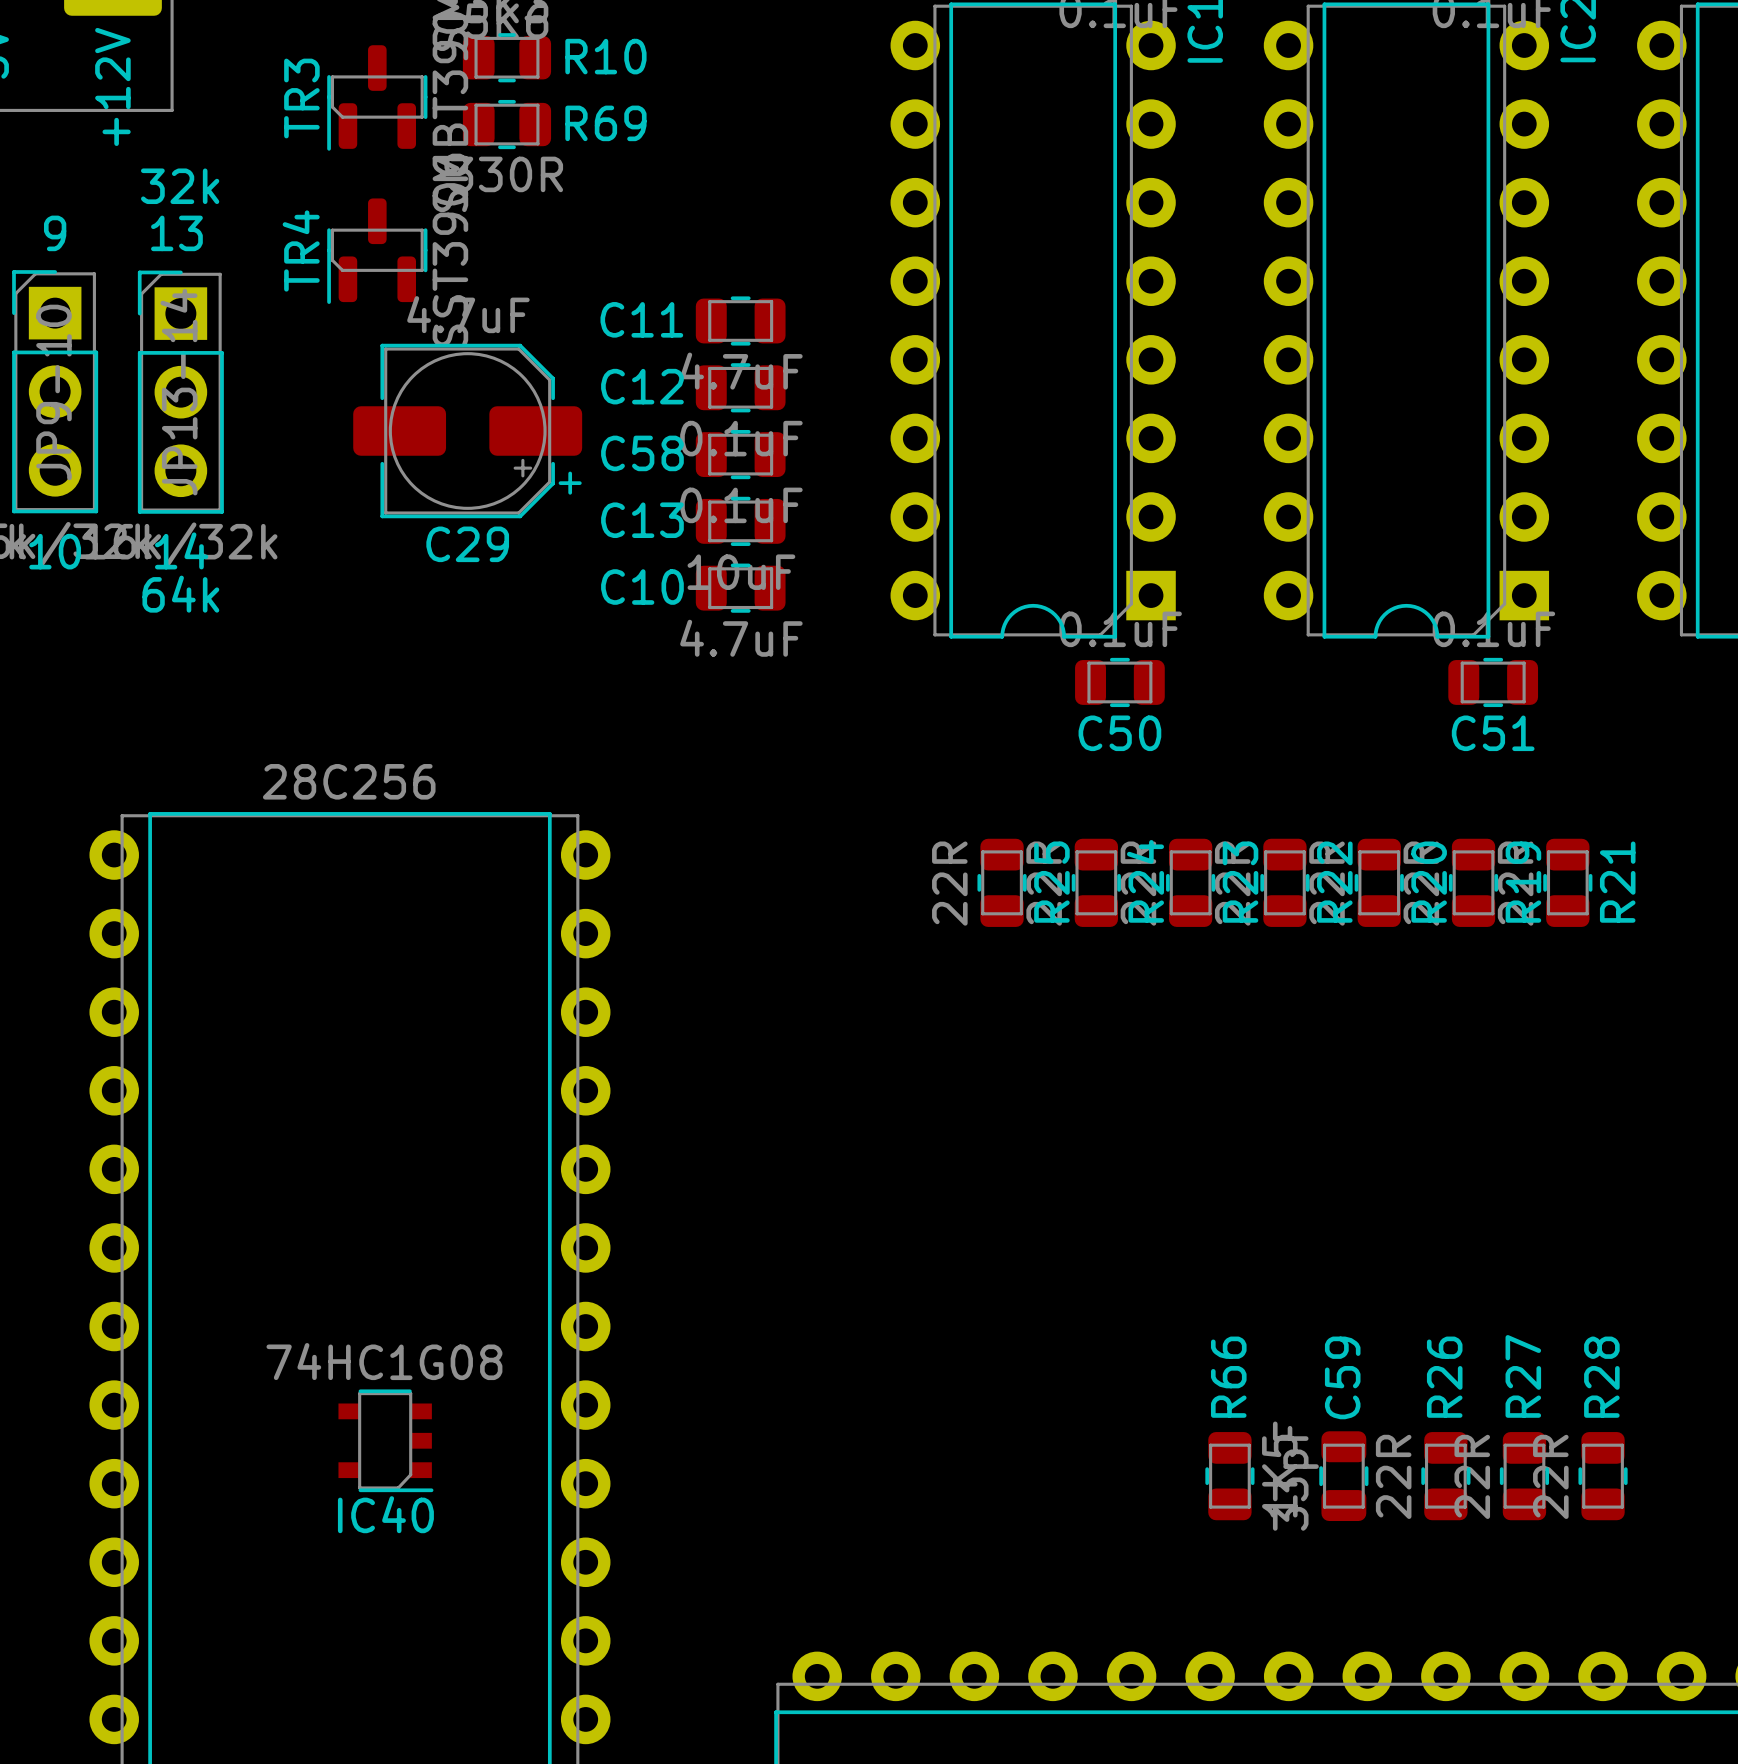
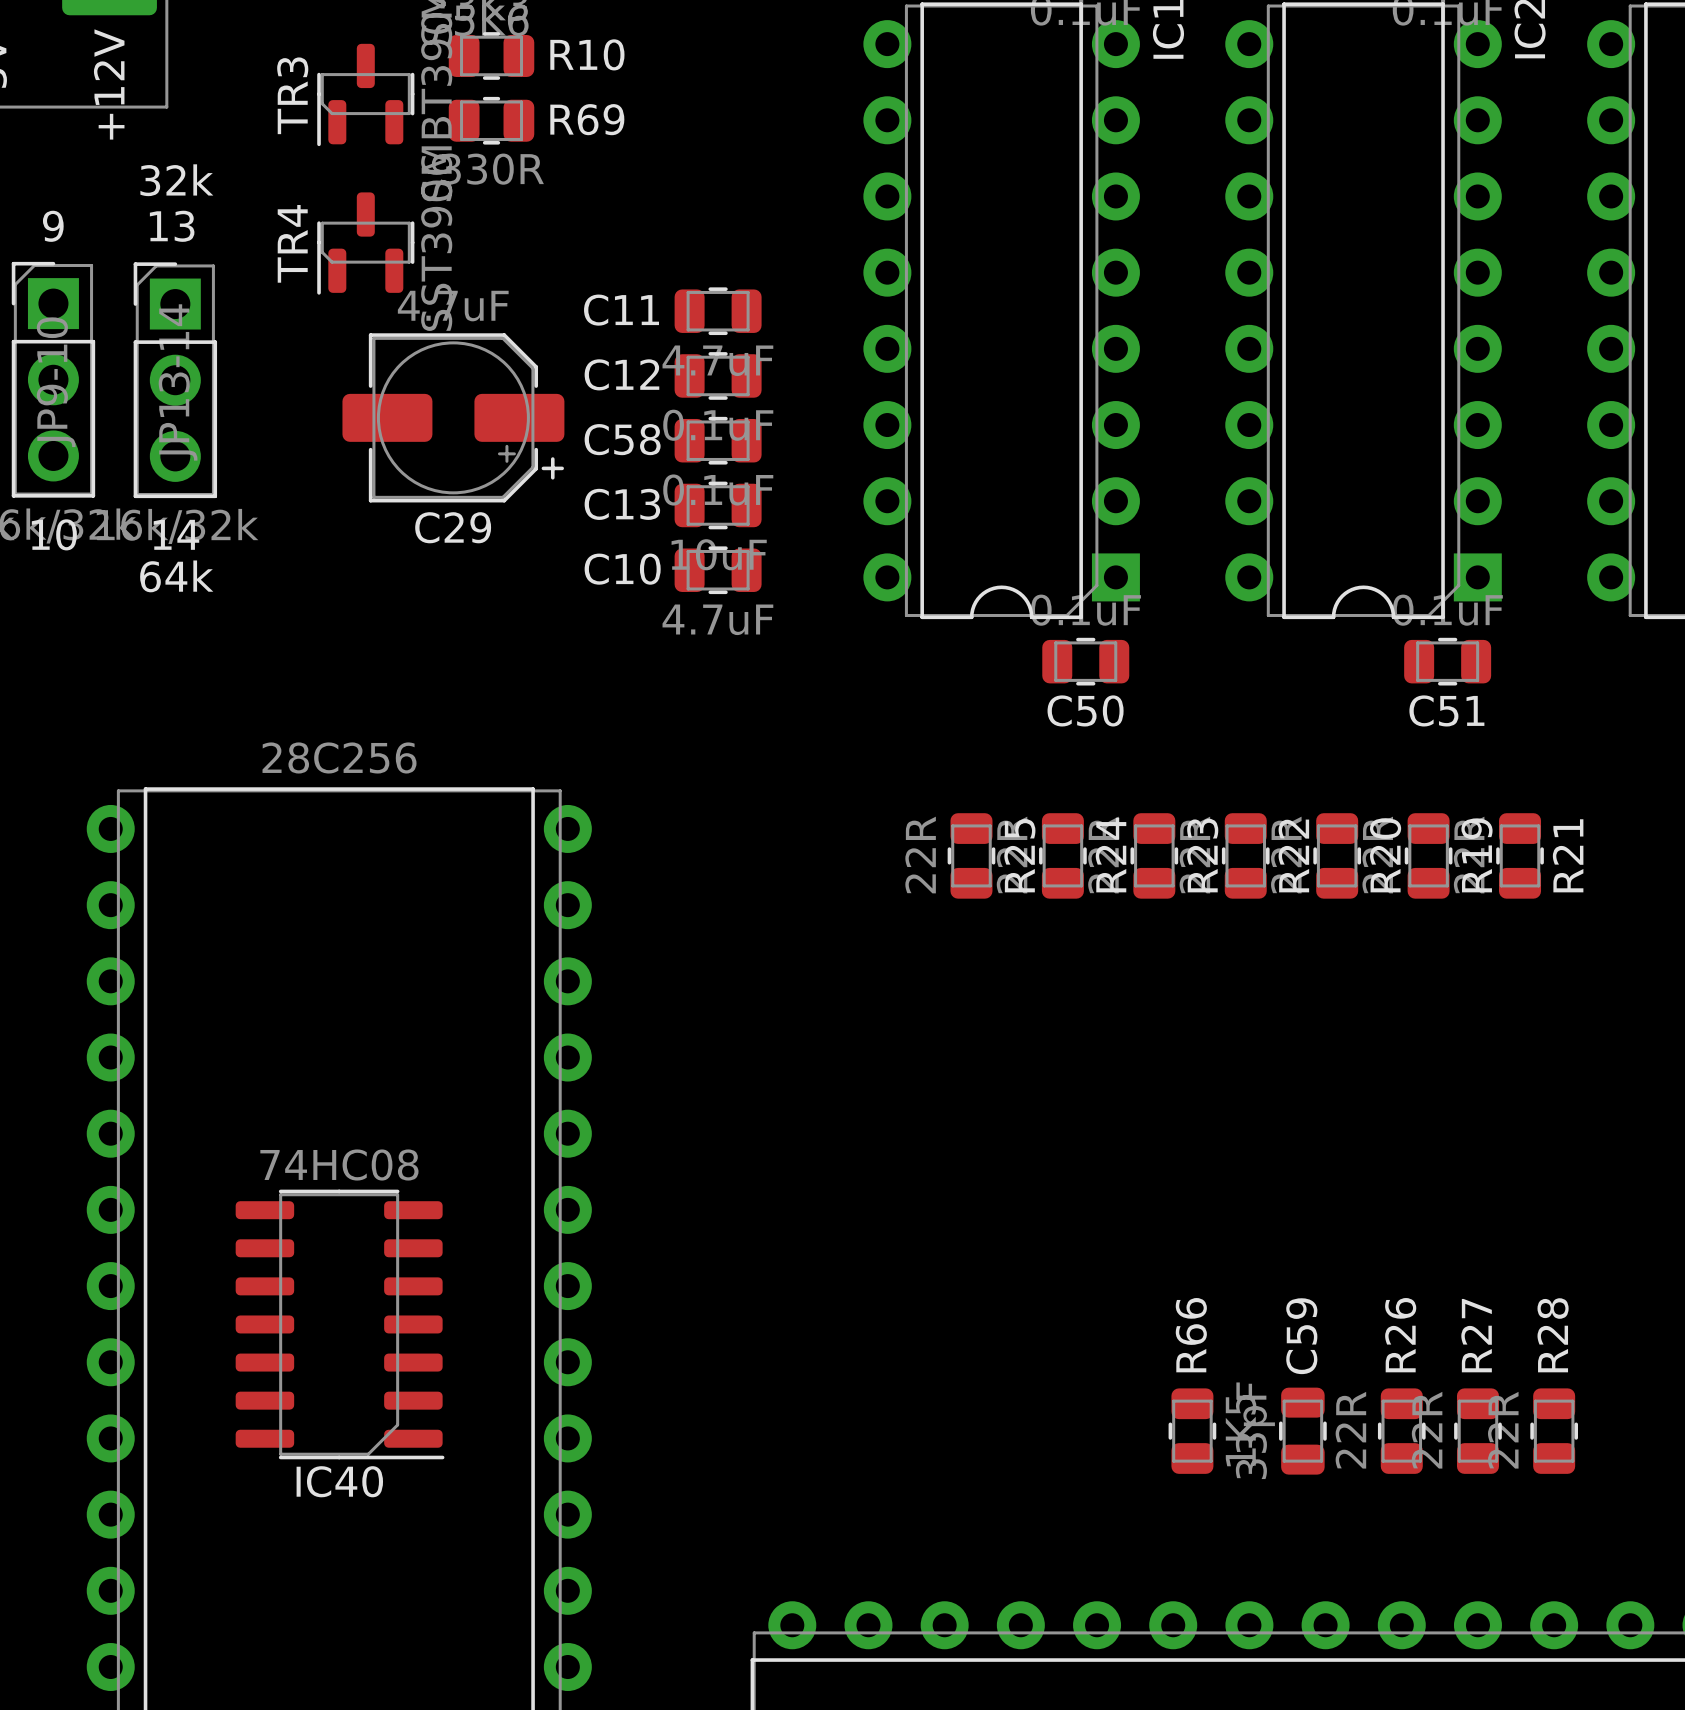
IC40 value: 74HC1G08 (384, 1361) -> 74HC08 (339, 1165)
IC40 footprint: [338, 1389, 434, 1493] -> [235, 1189, 445, 1460]
IC40 name position: IC40 (385, 1514) -> IC40 (339, 1481)

